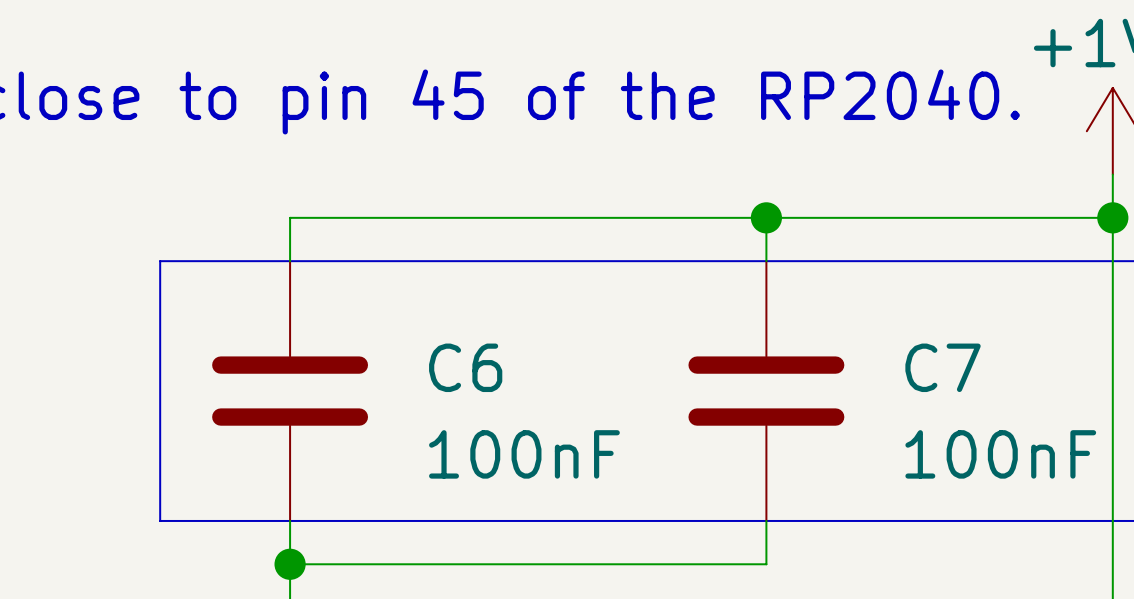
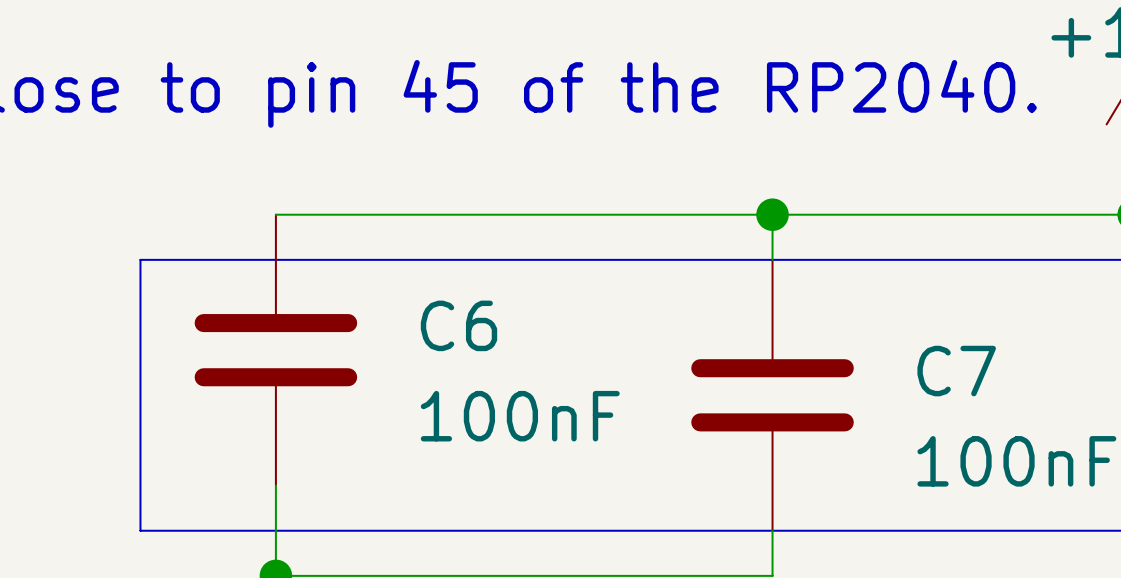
C6 position: (290, 391) -> (275, 350)

